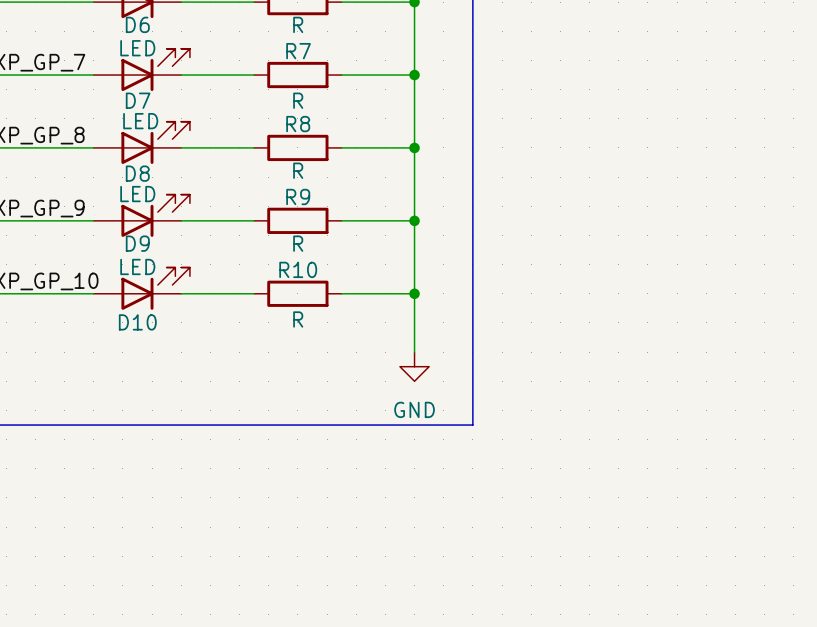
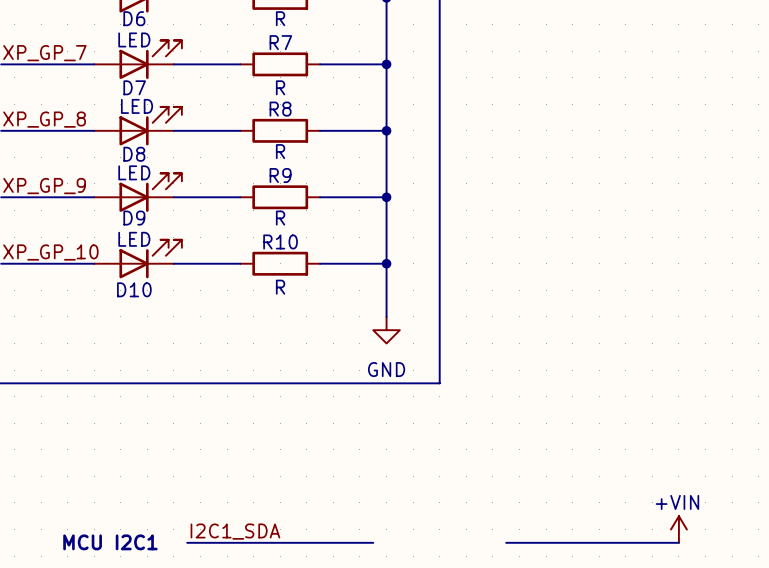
power symbol: none -> +VIN (678, 529)
label: none -> I2C1_SDA (235, 531)
text: none -> MCU I2C1 (110, 542)
wire: none -> (187, 542) (373, 542)
wire: none -> (506, 542) (678, 542)

